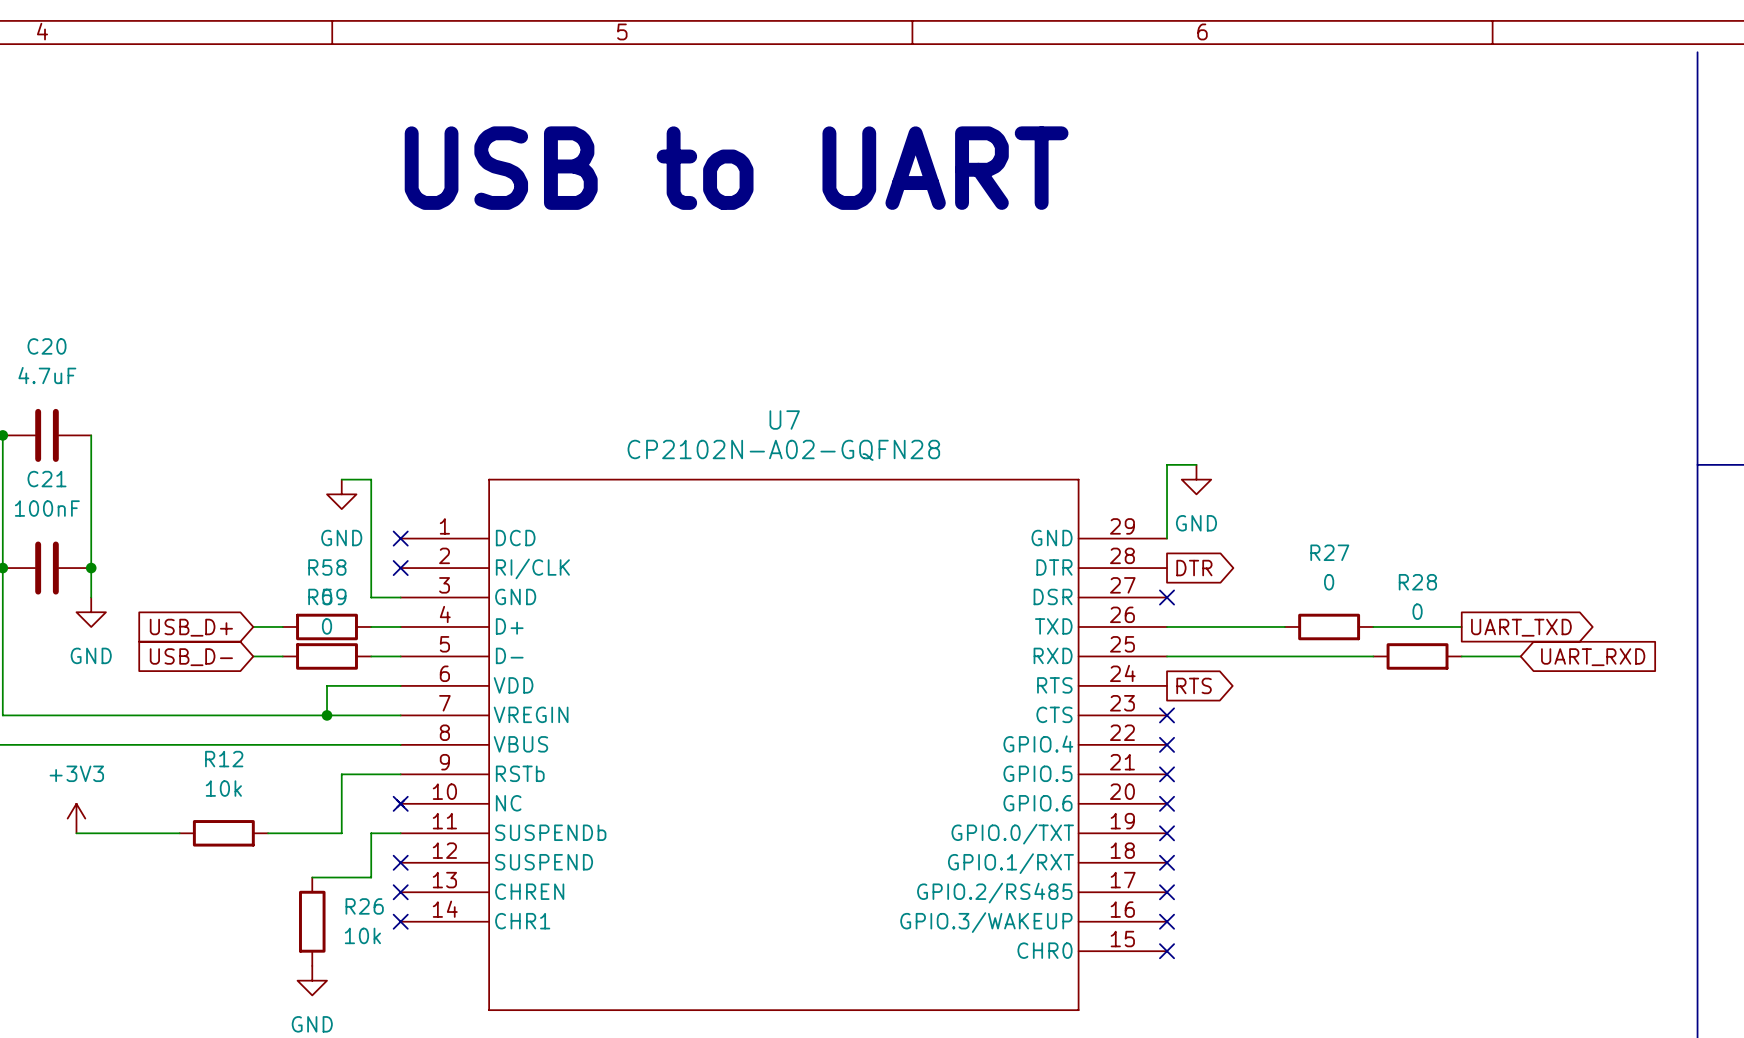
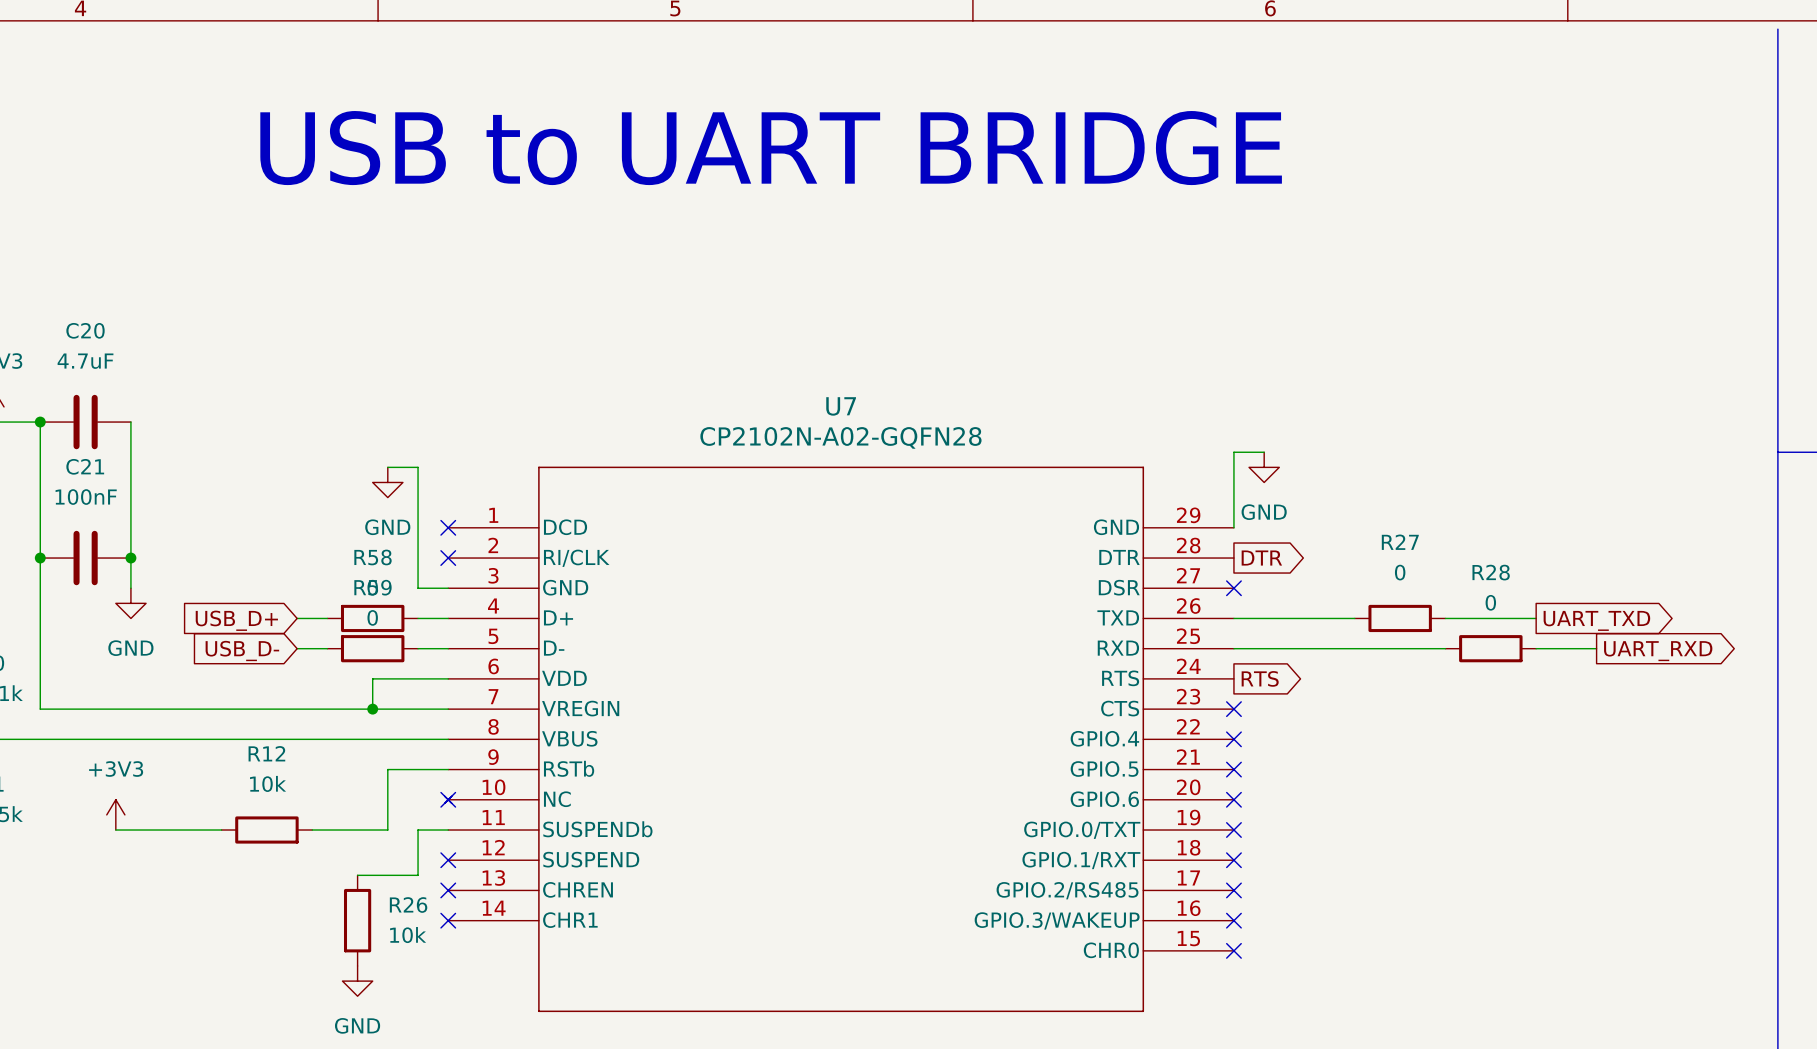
text: USB to UART (736, 168) -> USB to UART BRIDGE (771, 148)
global label shape: input (1593, 657) -> output (1658, 651)

